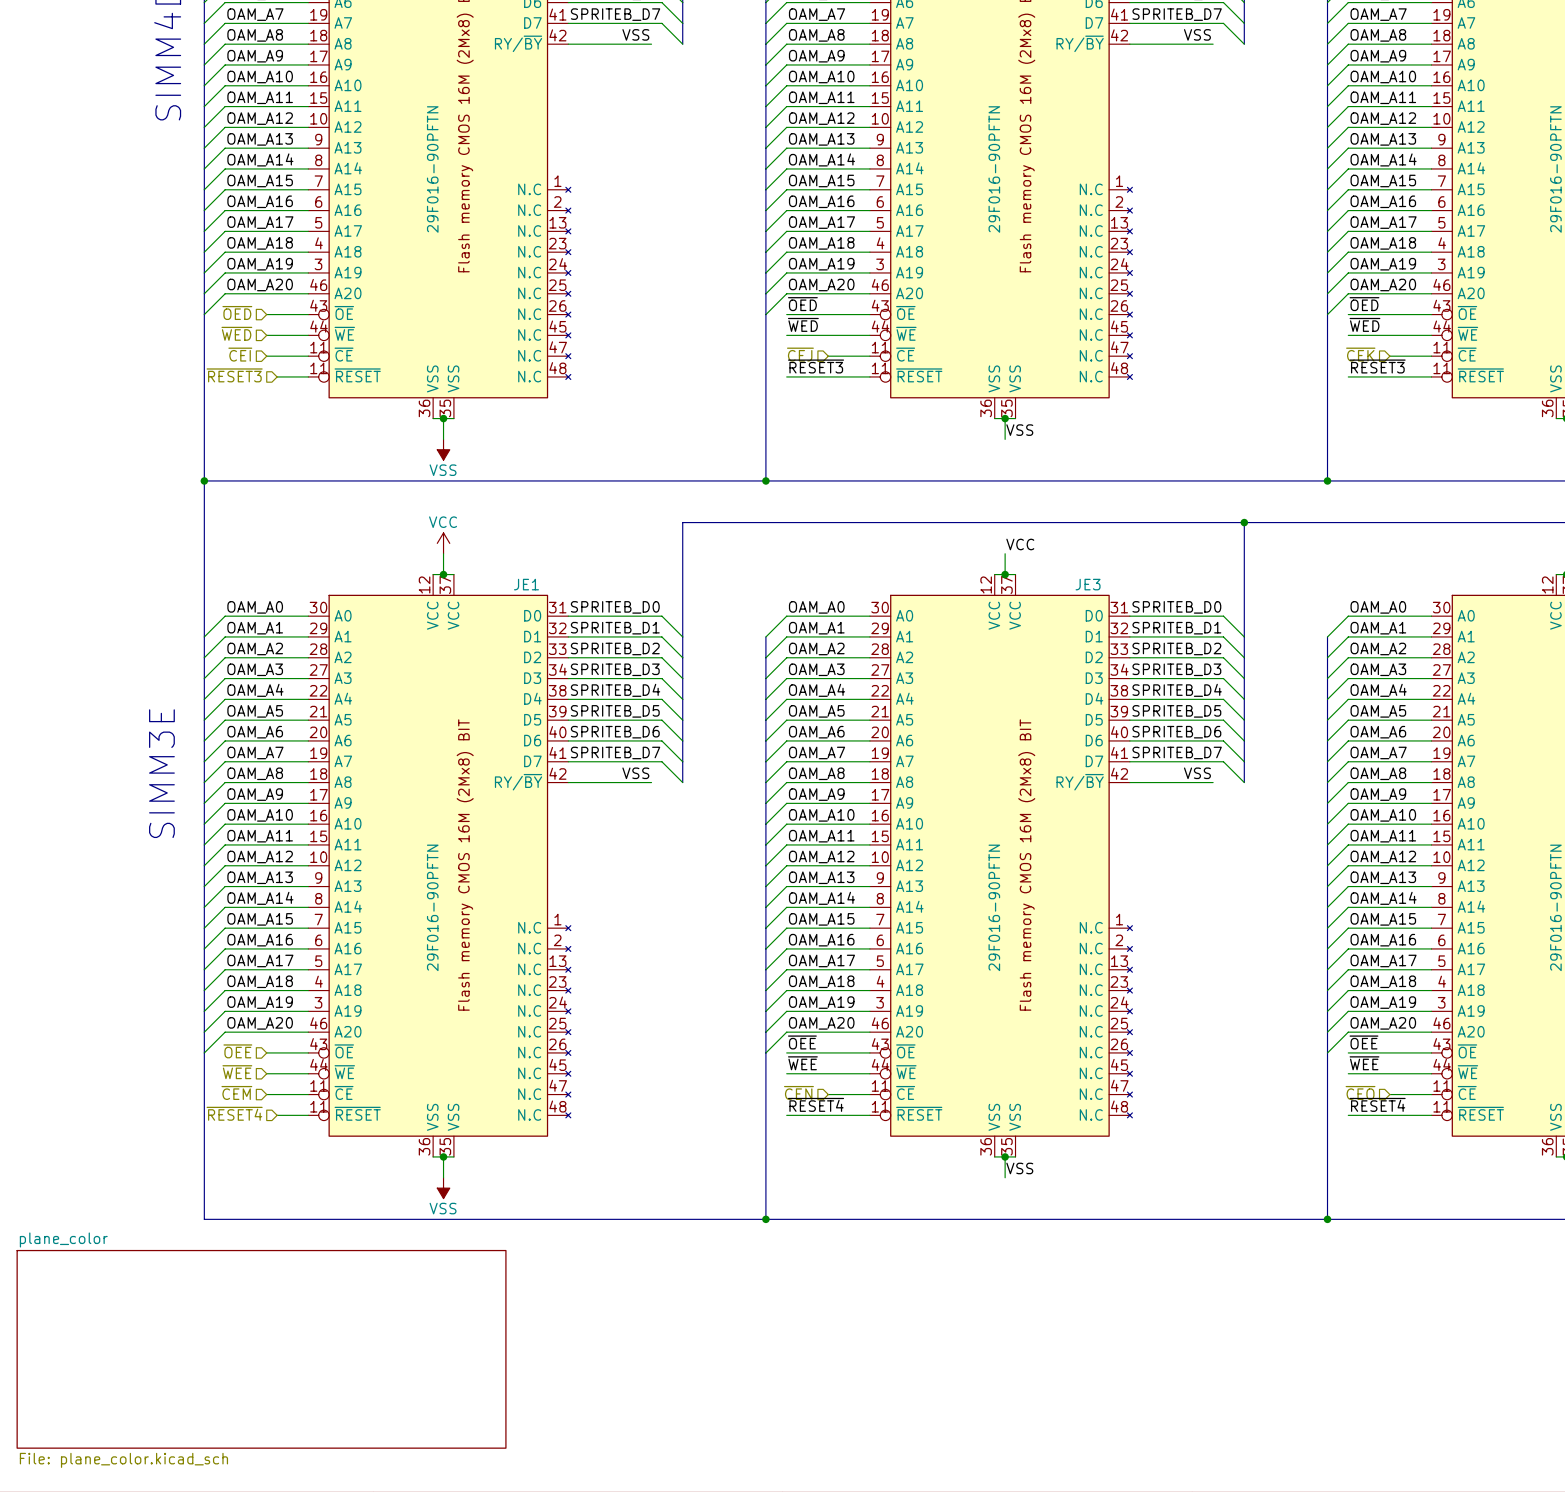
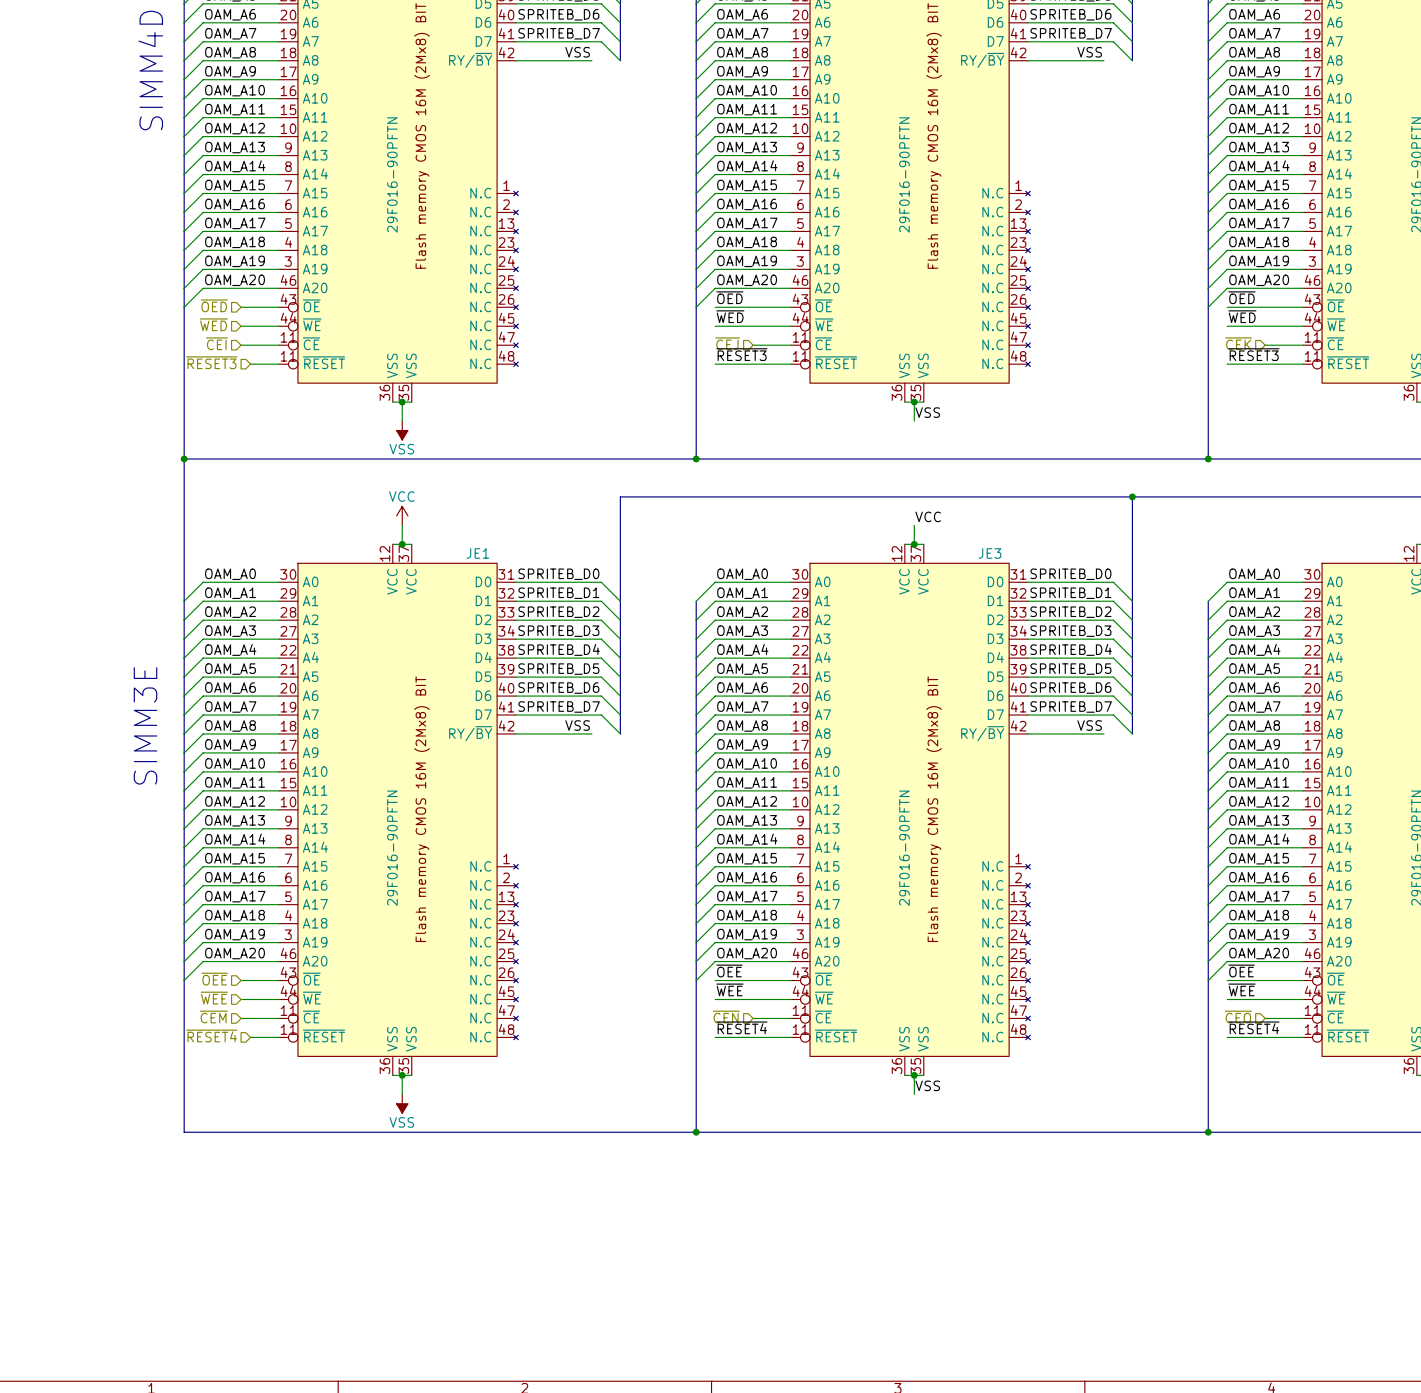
sheet plane_color: File: plane_color.kicad_sch (261, 1349) -> none

